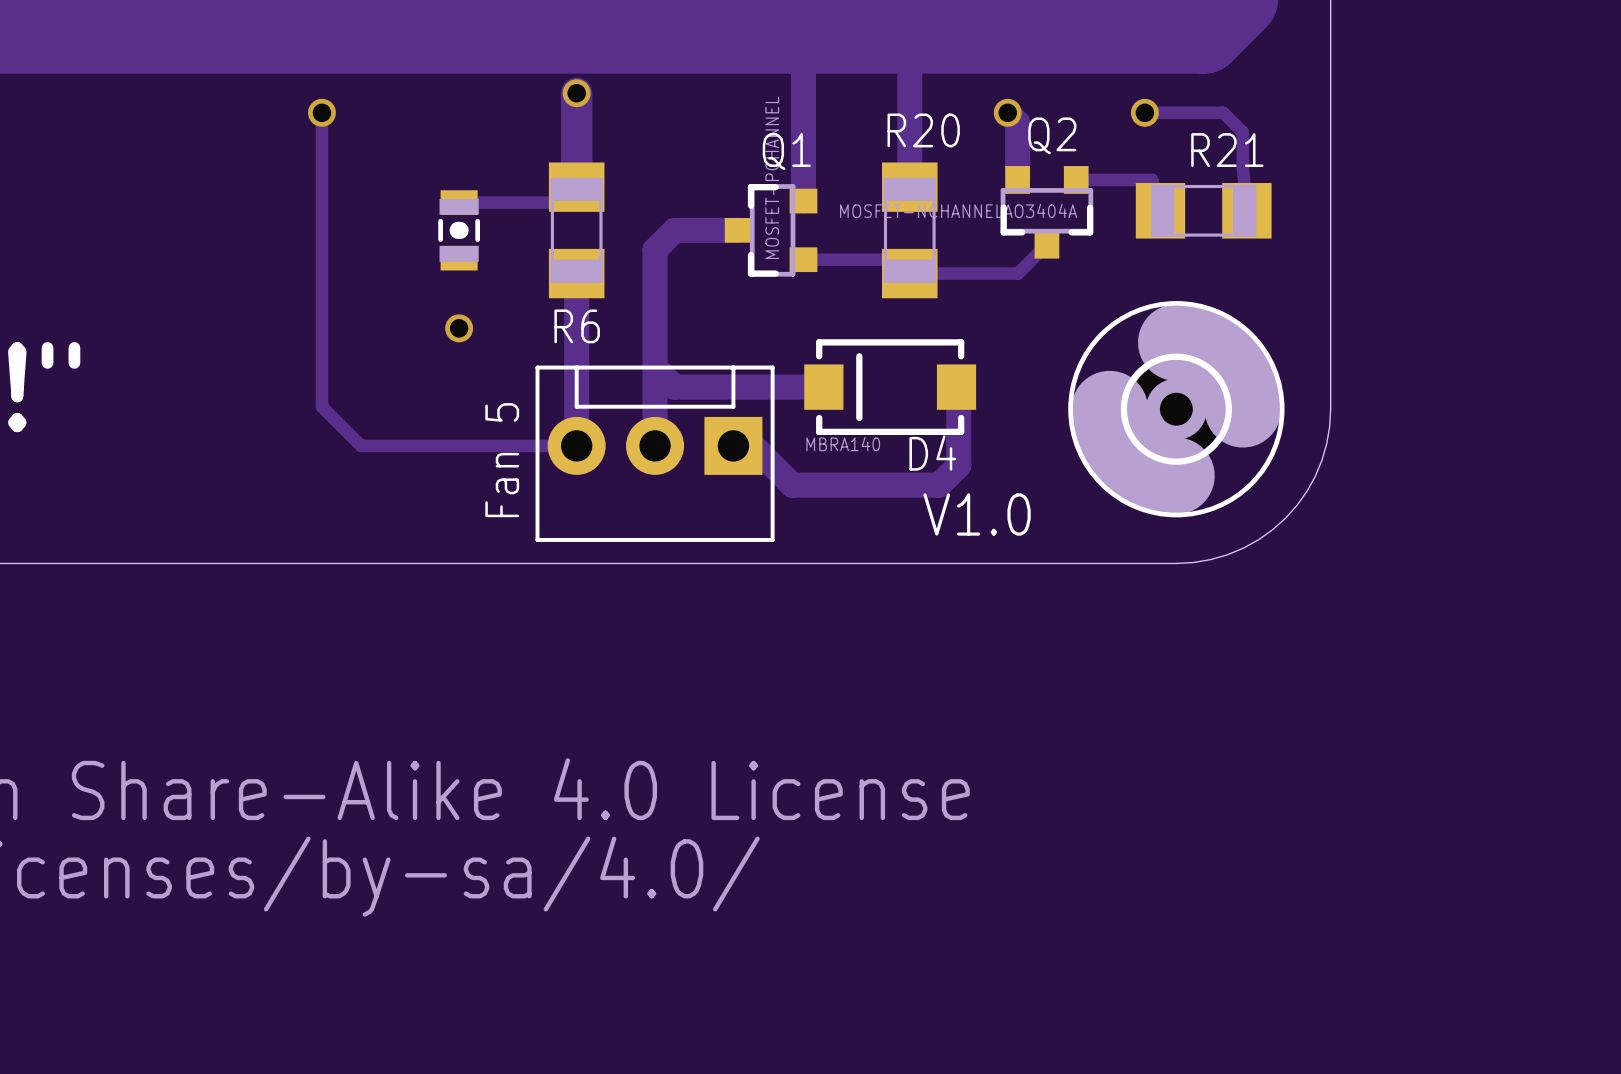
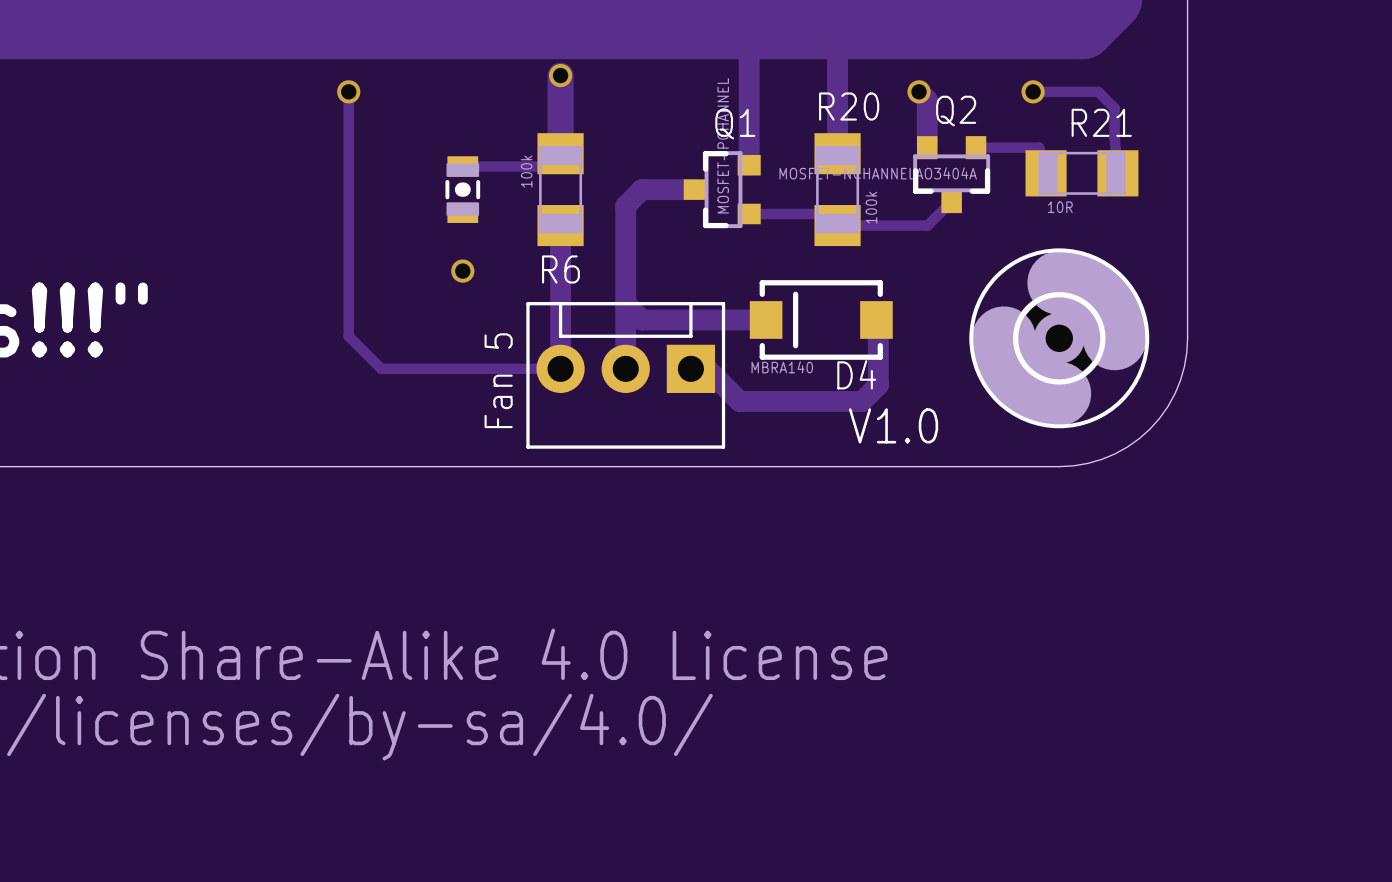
R6 value: none -> 100k (526, 171)
R21 value: none -> 10R (1060, 207)
R20 value: none -> 100k (871, 207)

